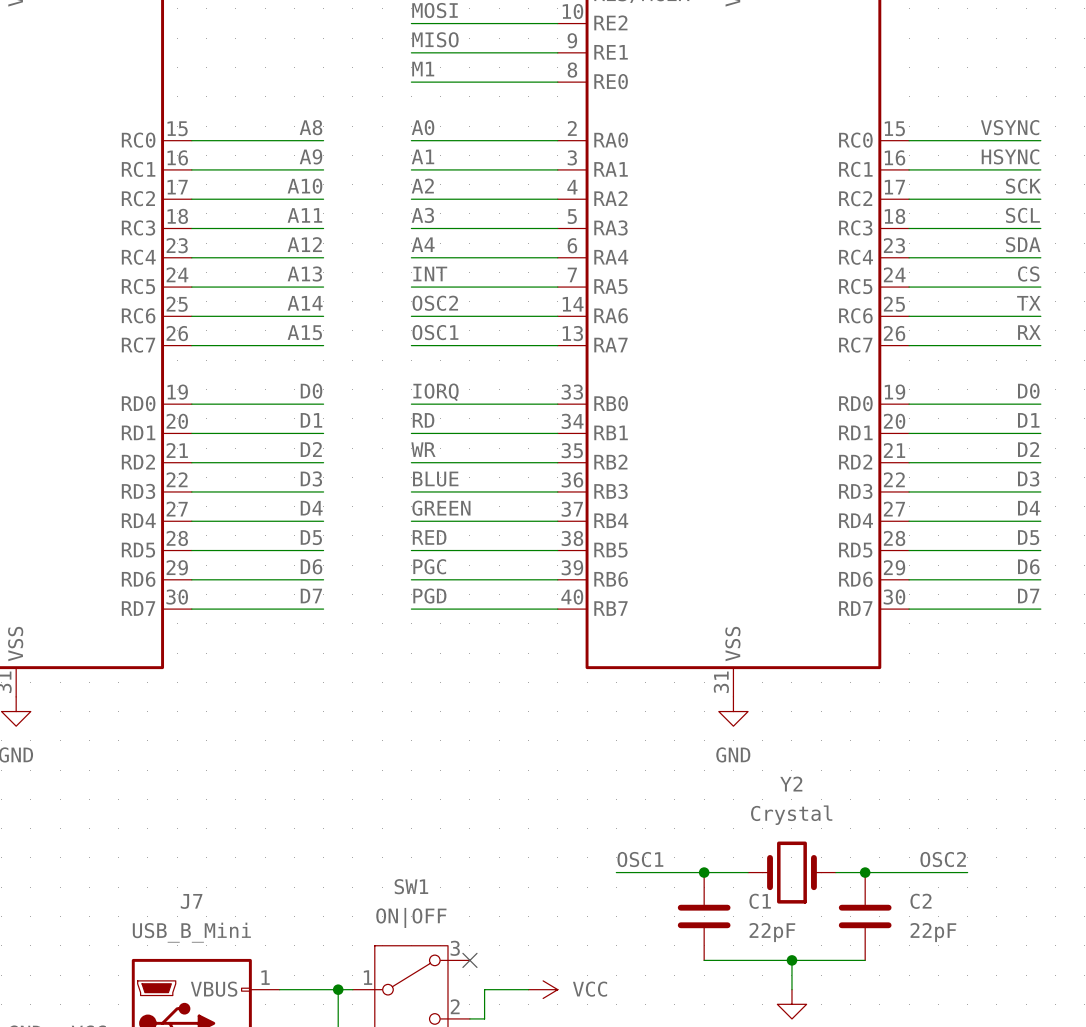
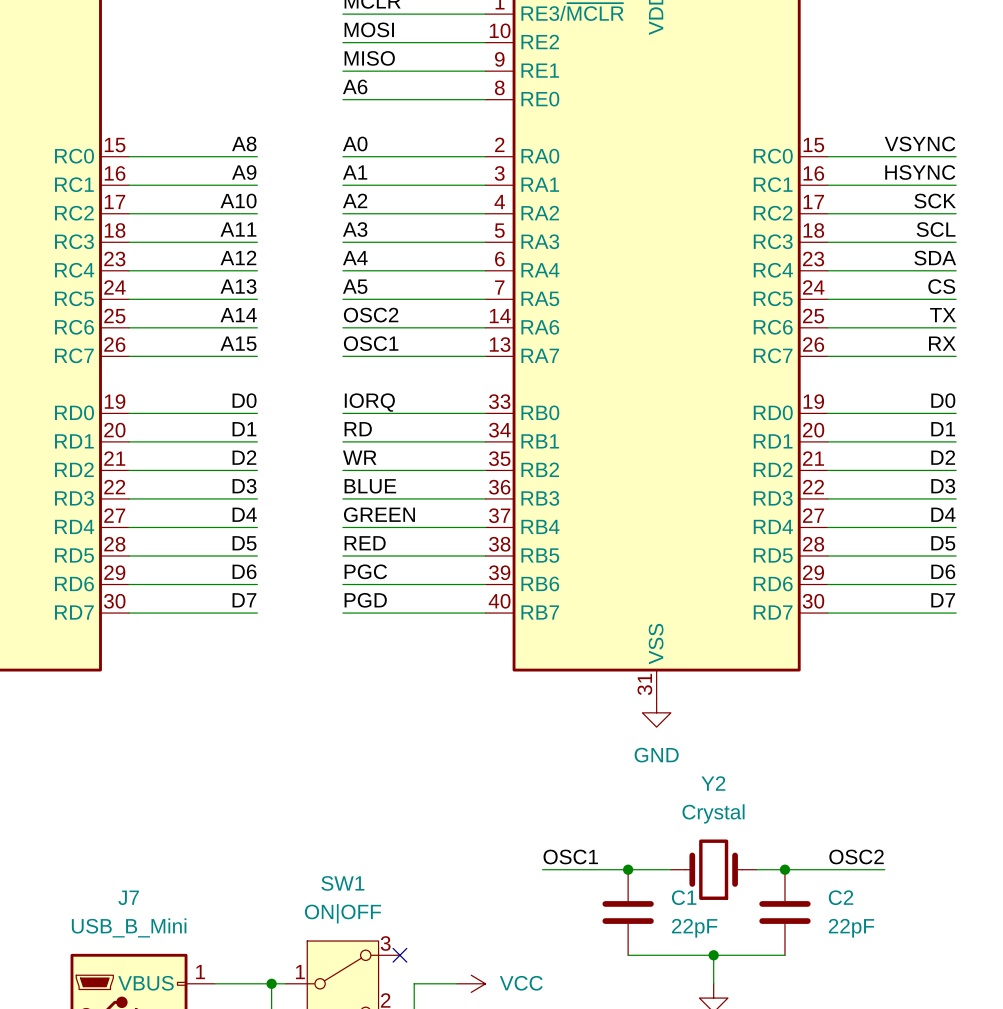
label: M1 (423, 69) -> A6 (355, 86)
label: INT (430, 273) -> A5 (355, 286)

